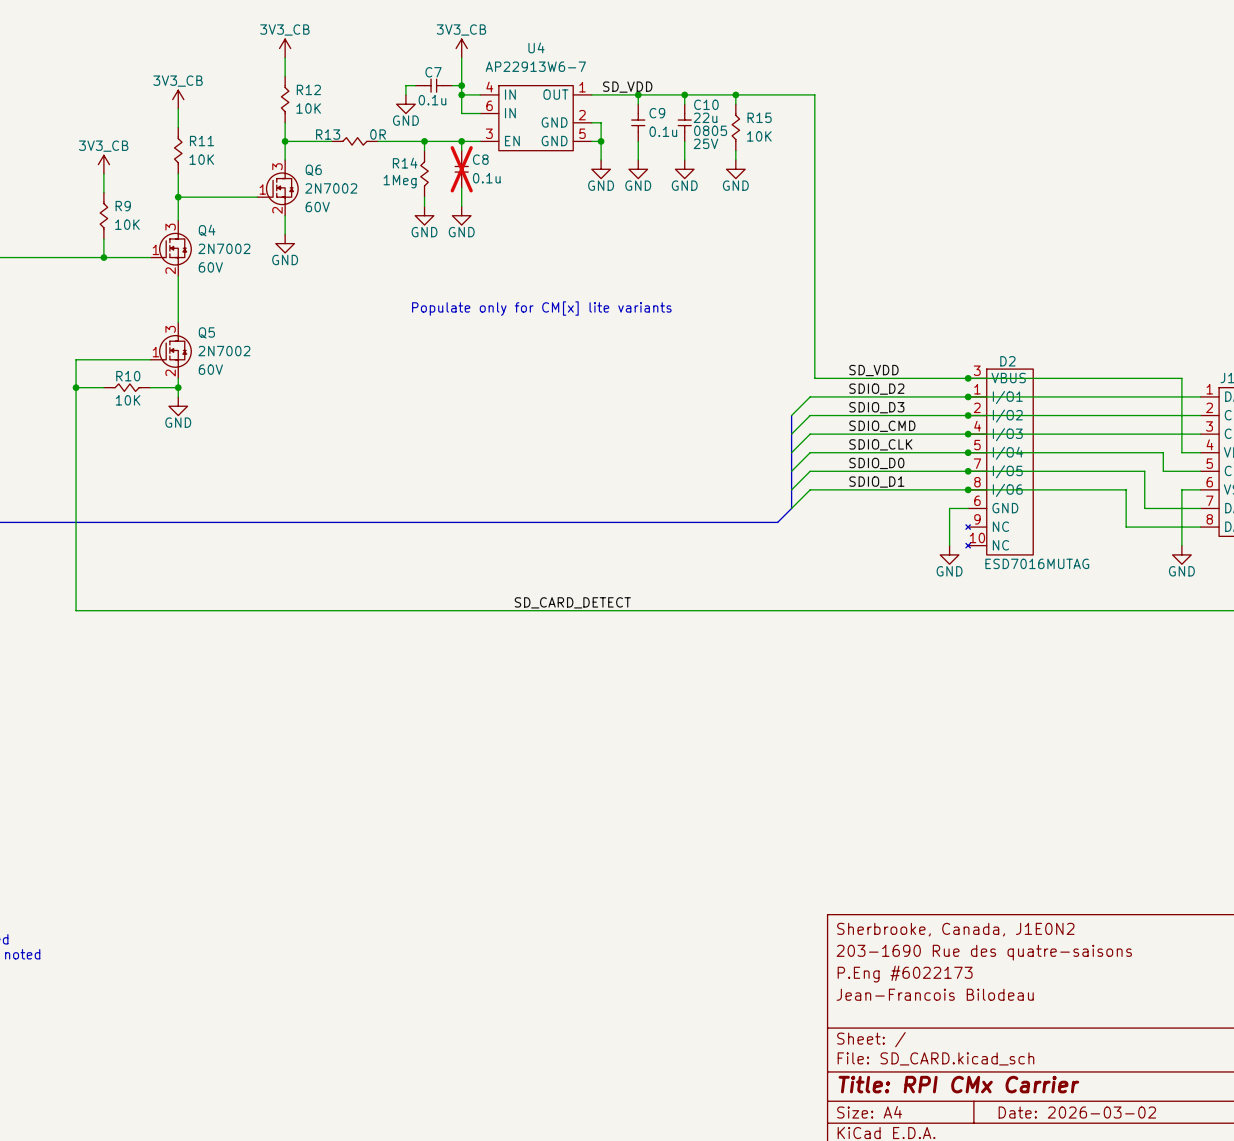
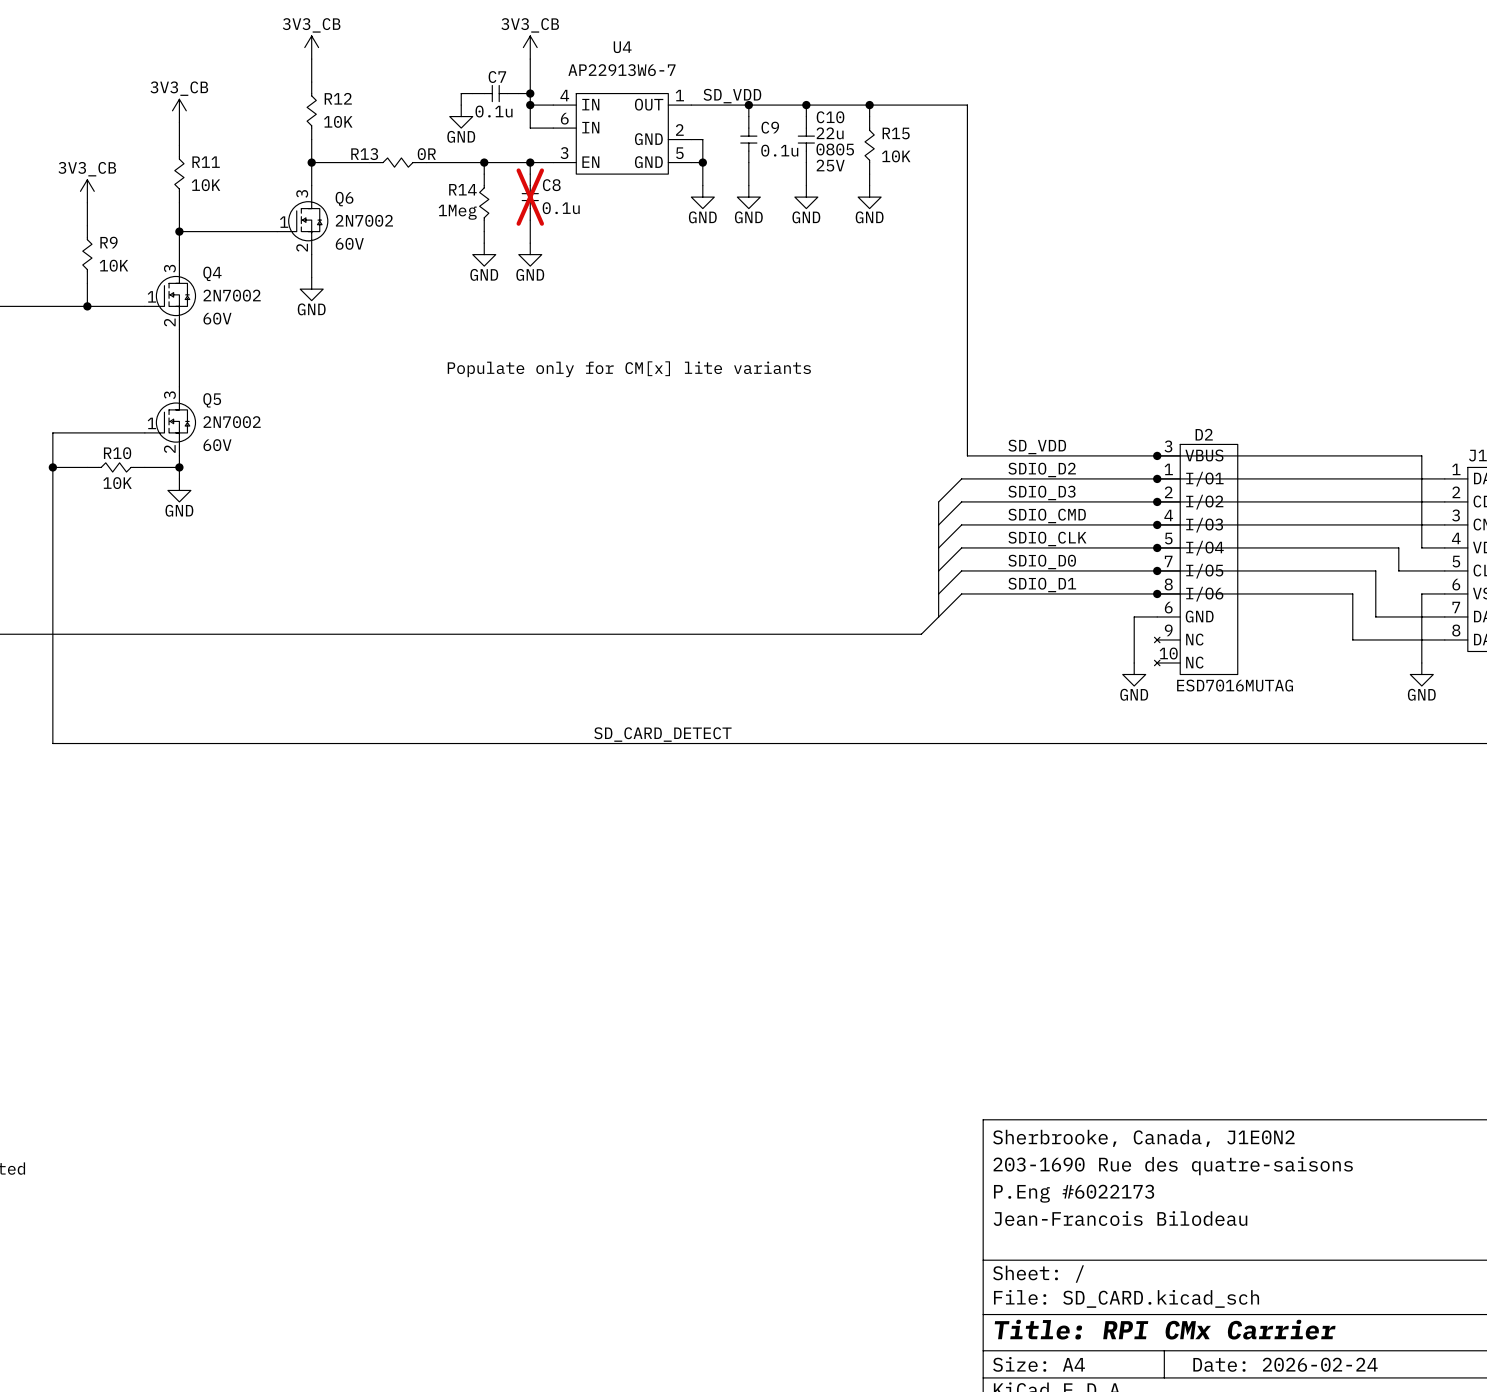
title block: Date: 2026-03-02 (1077, 1112) -> Date: 2026-02-24 (1285, 1364)

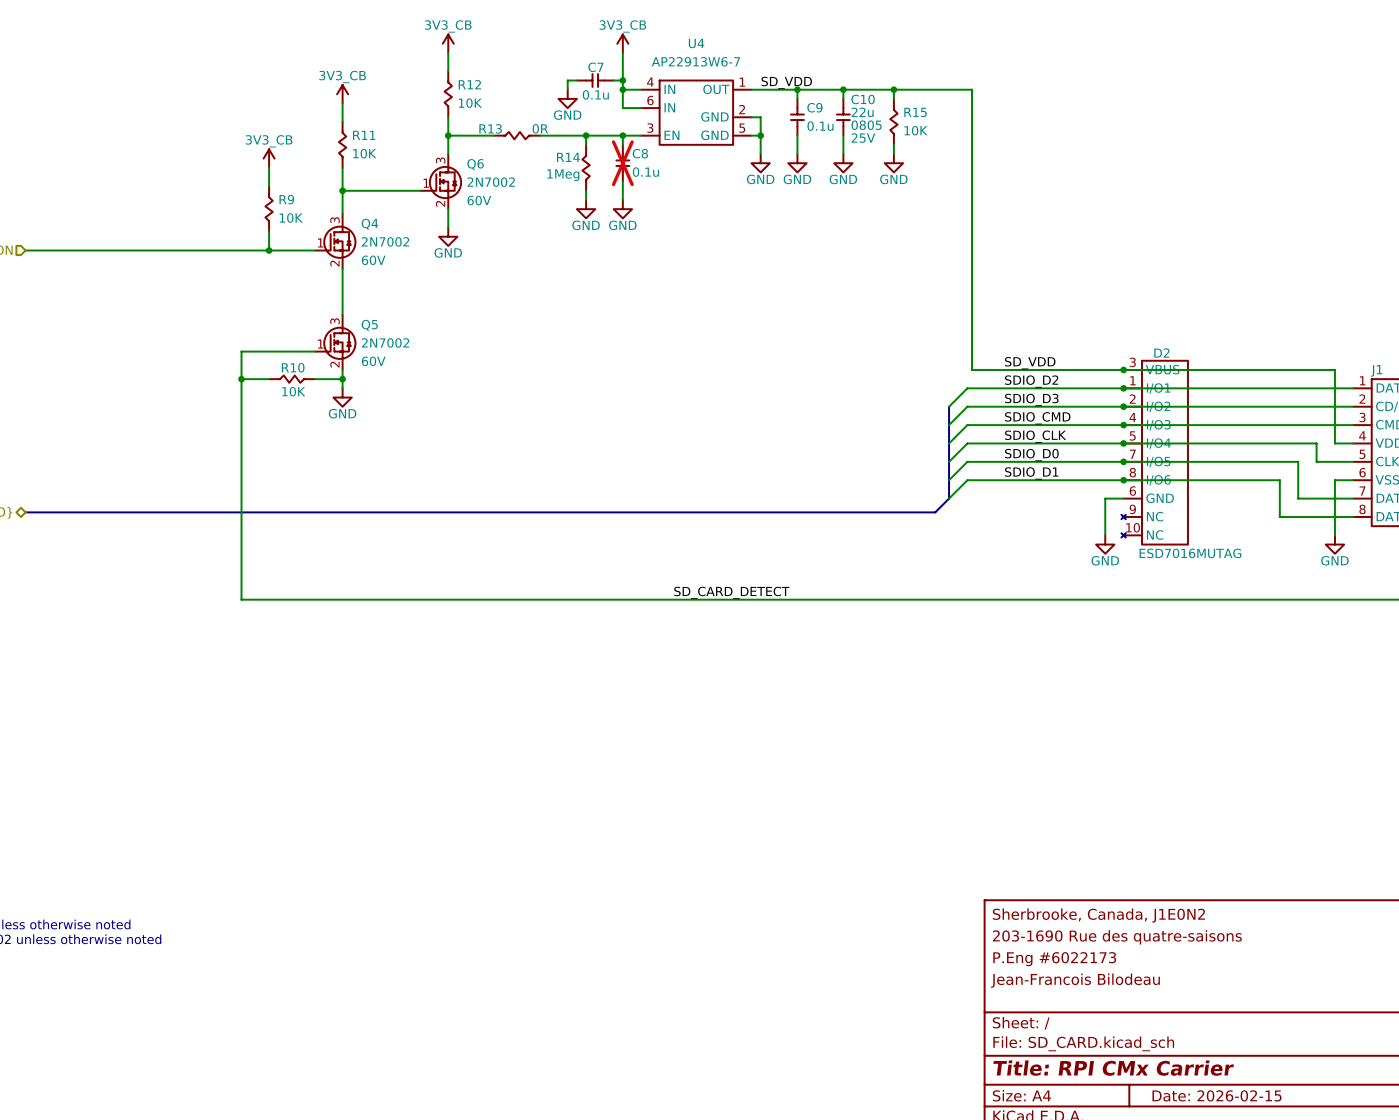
text: Populate only for CM[x] lite variants (629, 369) -> none
title block: Date: 2026-02-24 (1285, 1364) -> Date: 2026-02-15 (1217, 1095)

